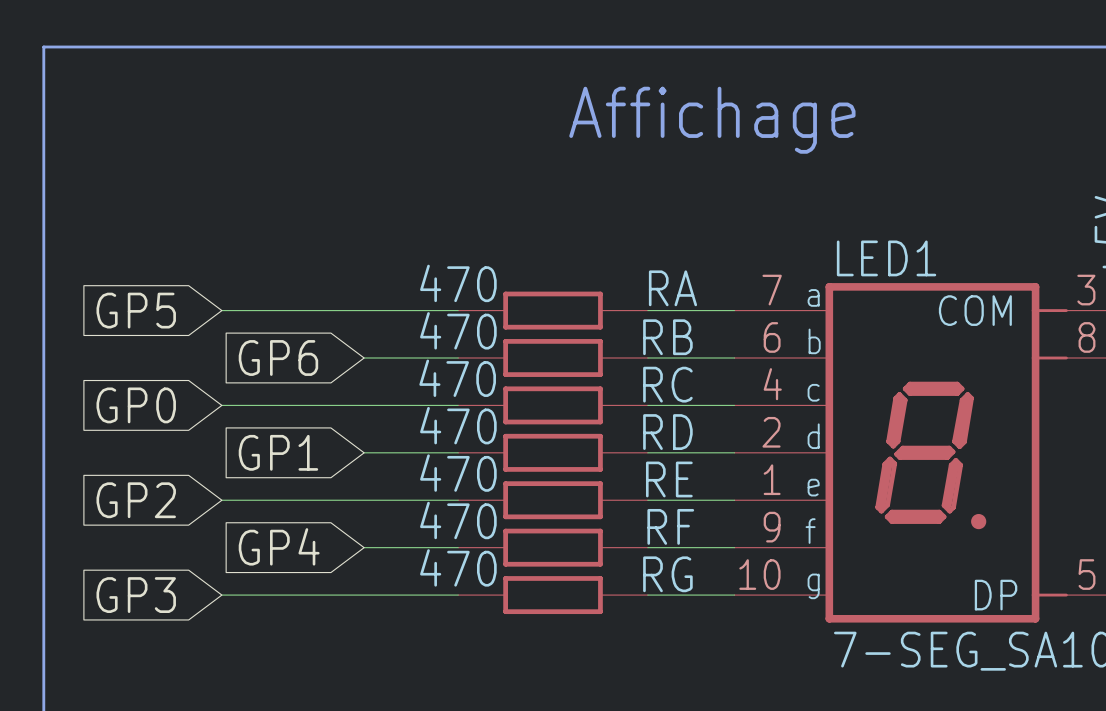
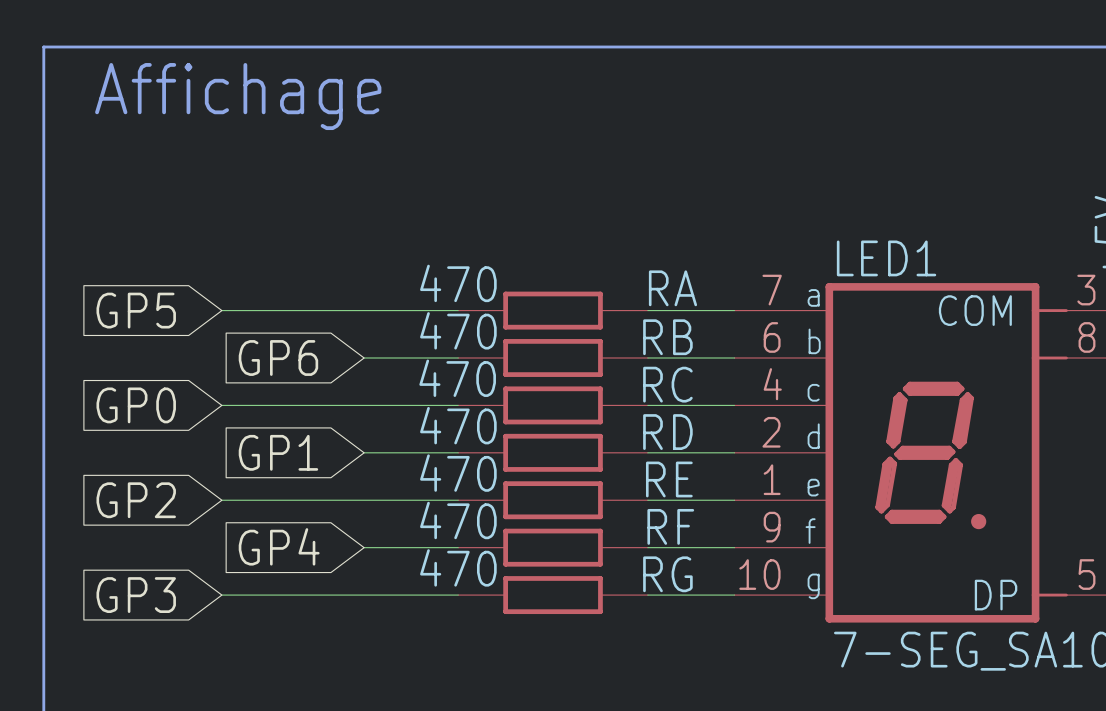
text: none -> Affichage (238, 96)
text: Affichage (712, 120) -> none

